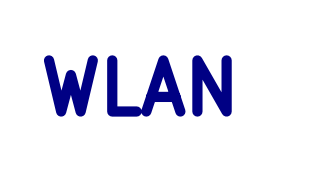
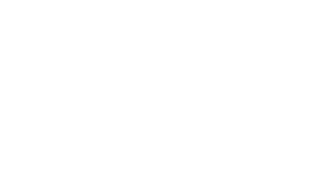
text: WLAN (137, 85) -> none

